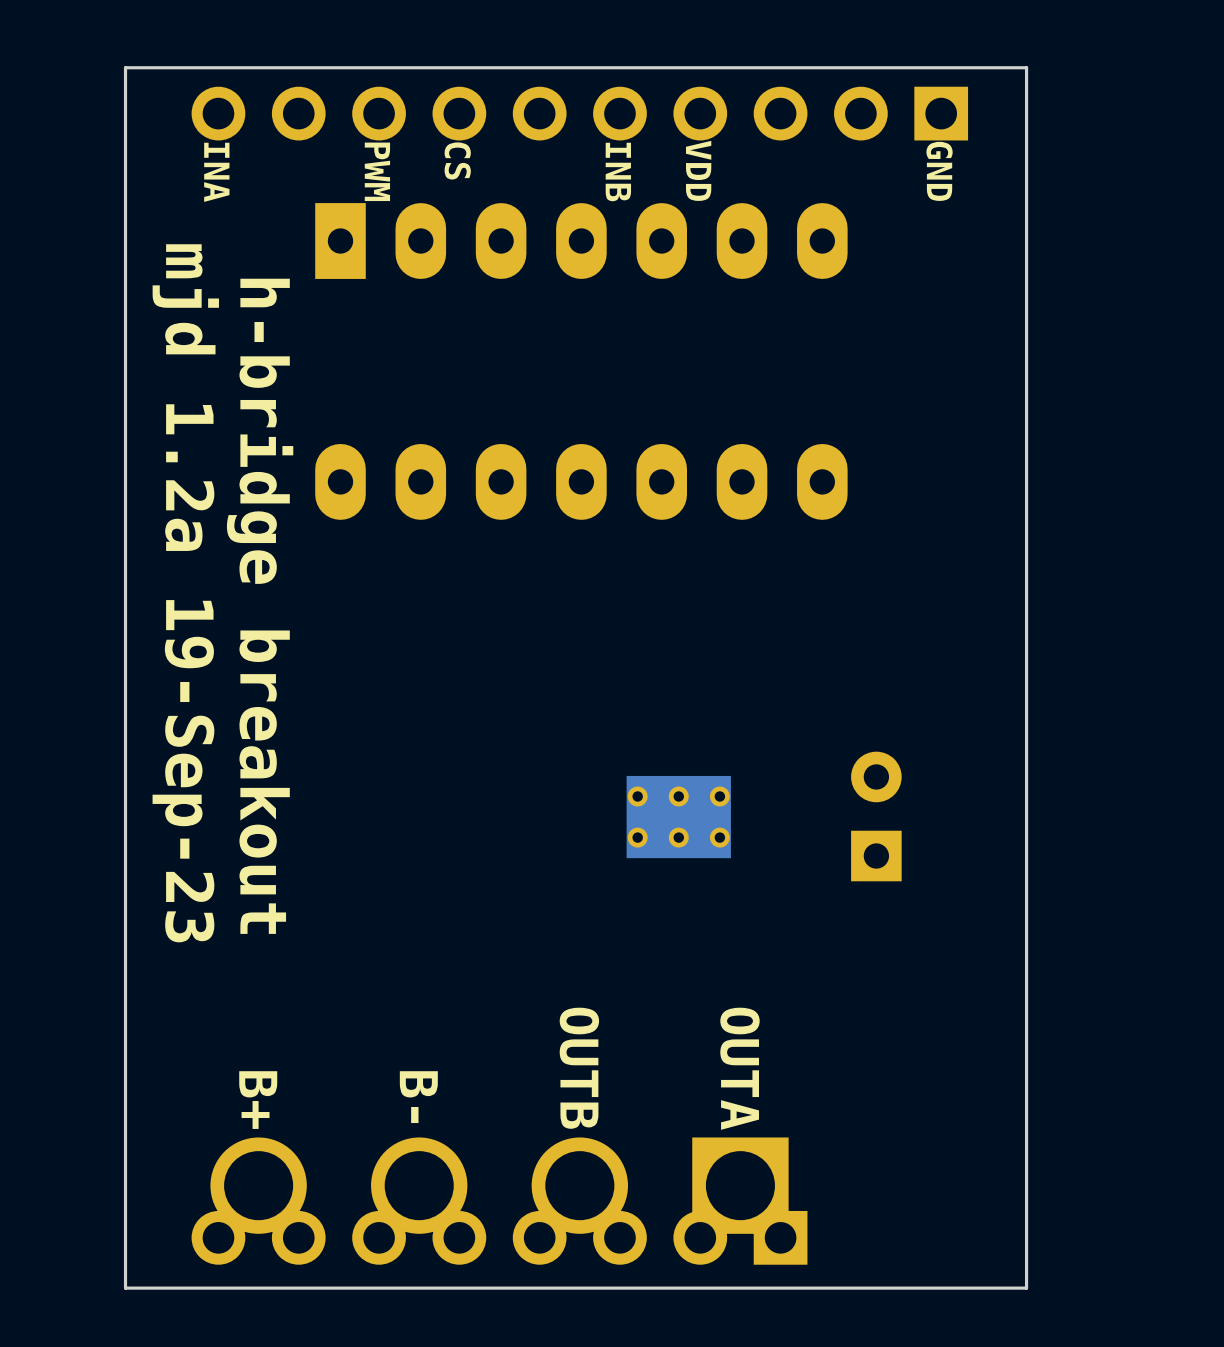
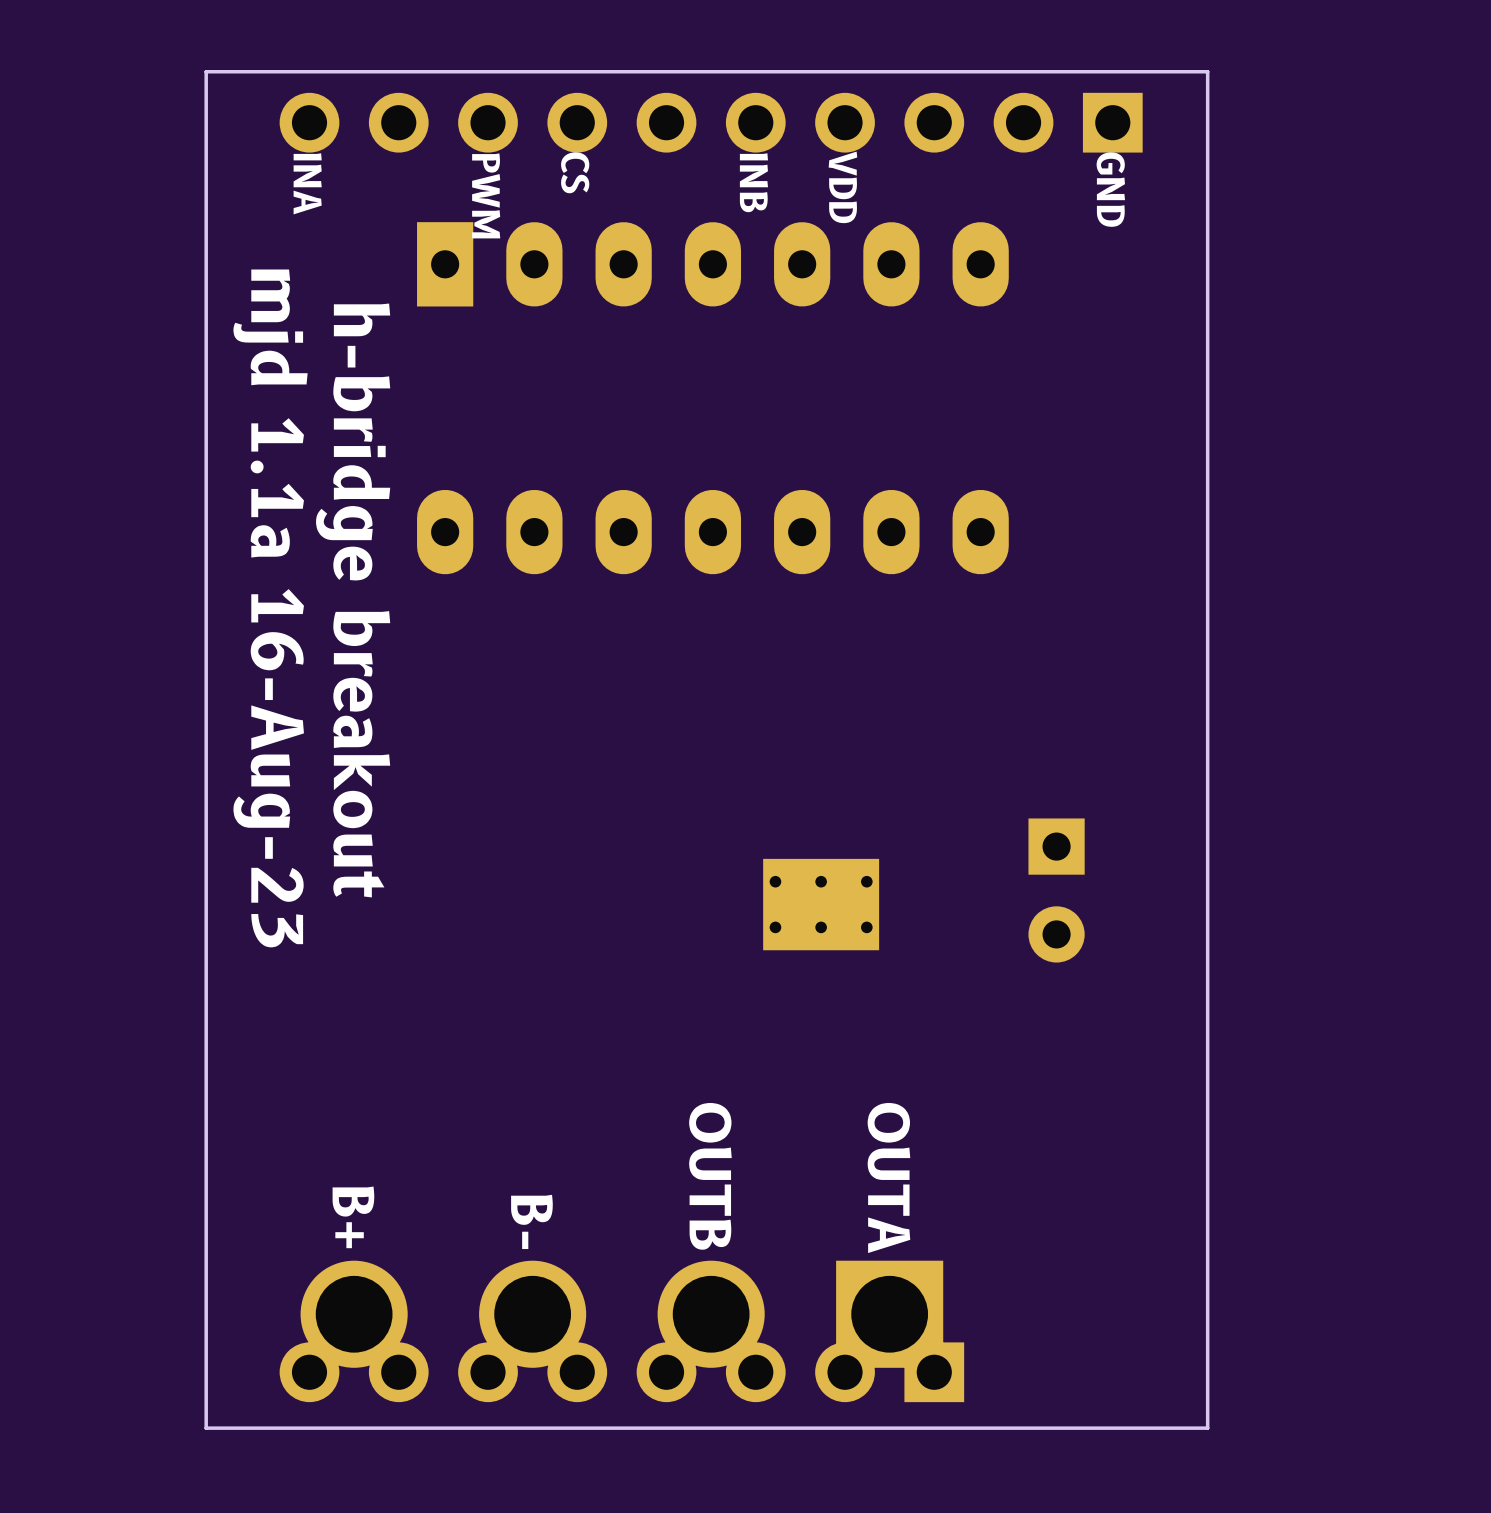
text: mjd 1.2a 19-Sep-23 (185, 593) -> mjd 1.1a 16-Aug-23 (270, 608)
part rotation: 0° (876, 816) -> 180° (1056, 890)

